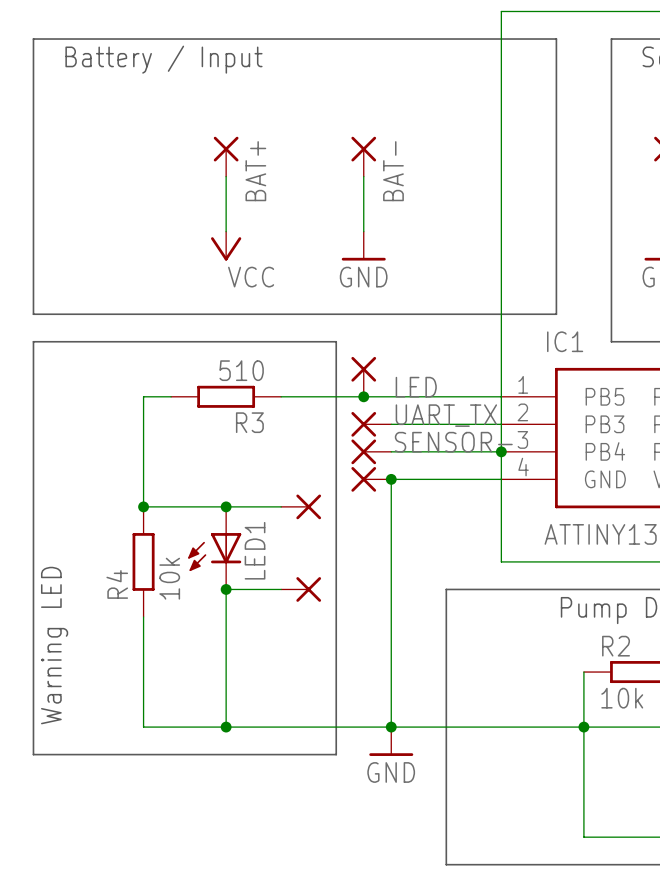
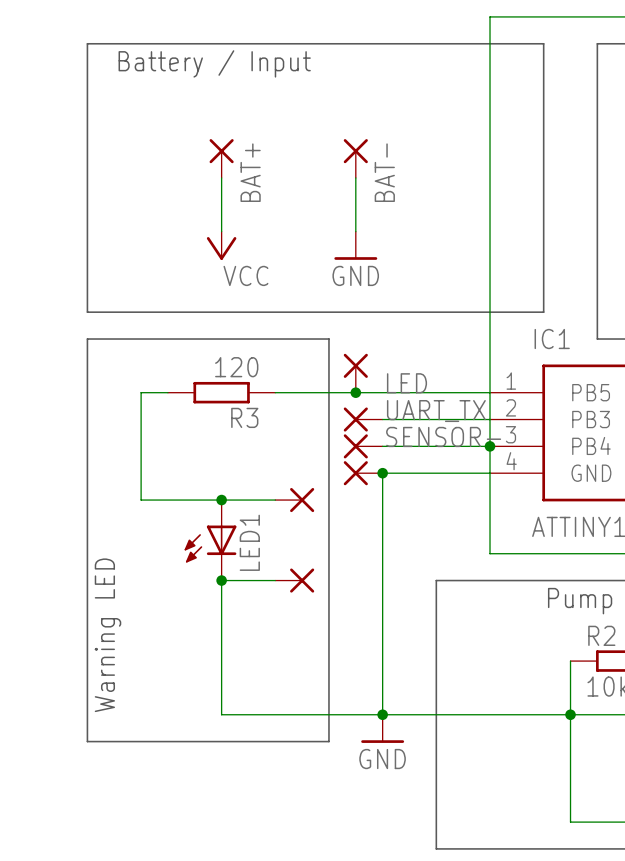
line: (88, 39) (33, 39) (33, 314) (88, 314) -> (87, 43) (87, 312)
text position: Battery / Input (163, 59) -> Battery / Input (214, 63)
line: (88, 341) (33, 341) (33, 754) (88, 754) -> (87, 339) (87, 741)
R3 value: 510 (241, 370) -> 120 (236, 367)
junction: (143, 506) -> none
R4: 10k (143, 561) -> none
wire: (143, 616) (143, 727) (226, 727) -> none
text position: Warning LED (54, 645) -> Warning LED (108, 635)
junction: (226, 727) -> none

